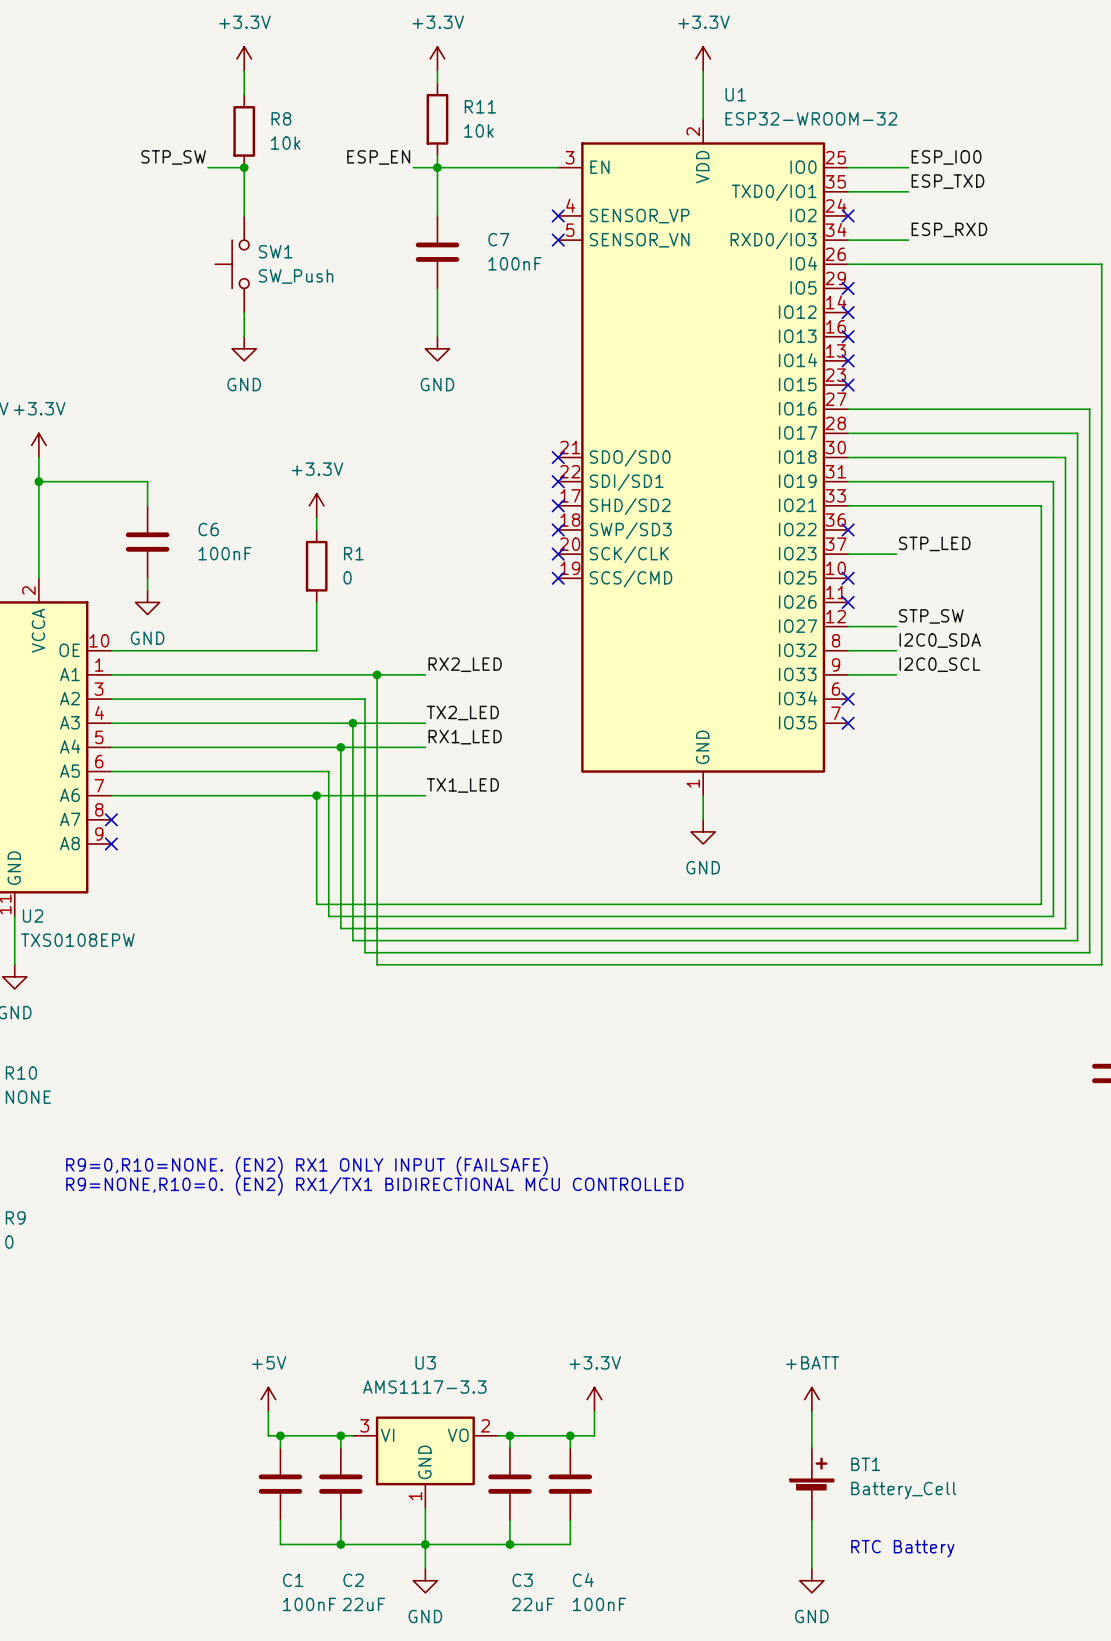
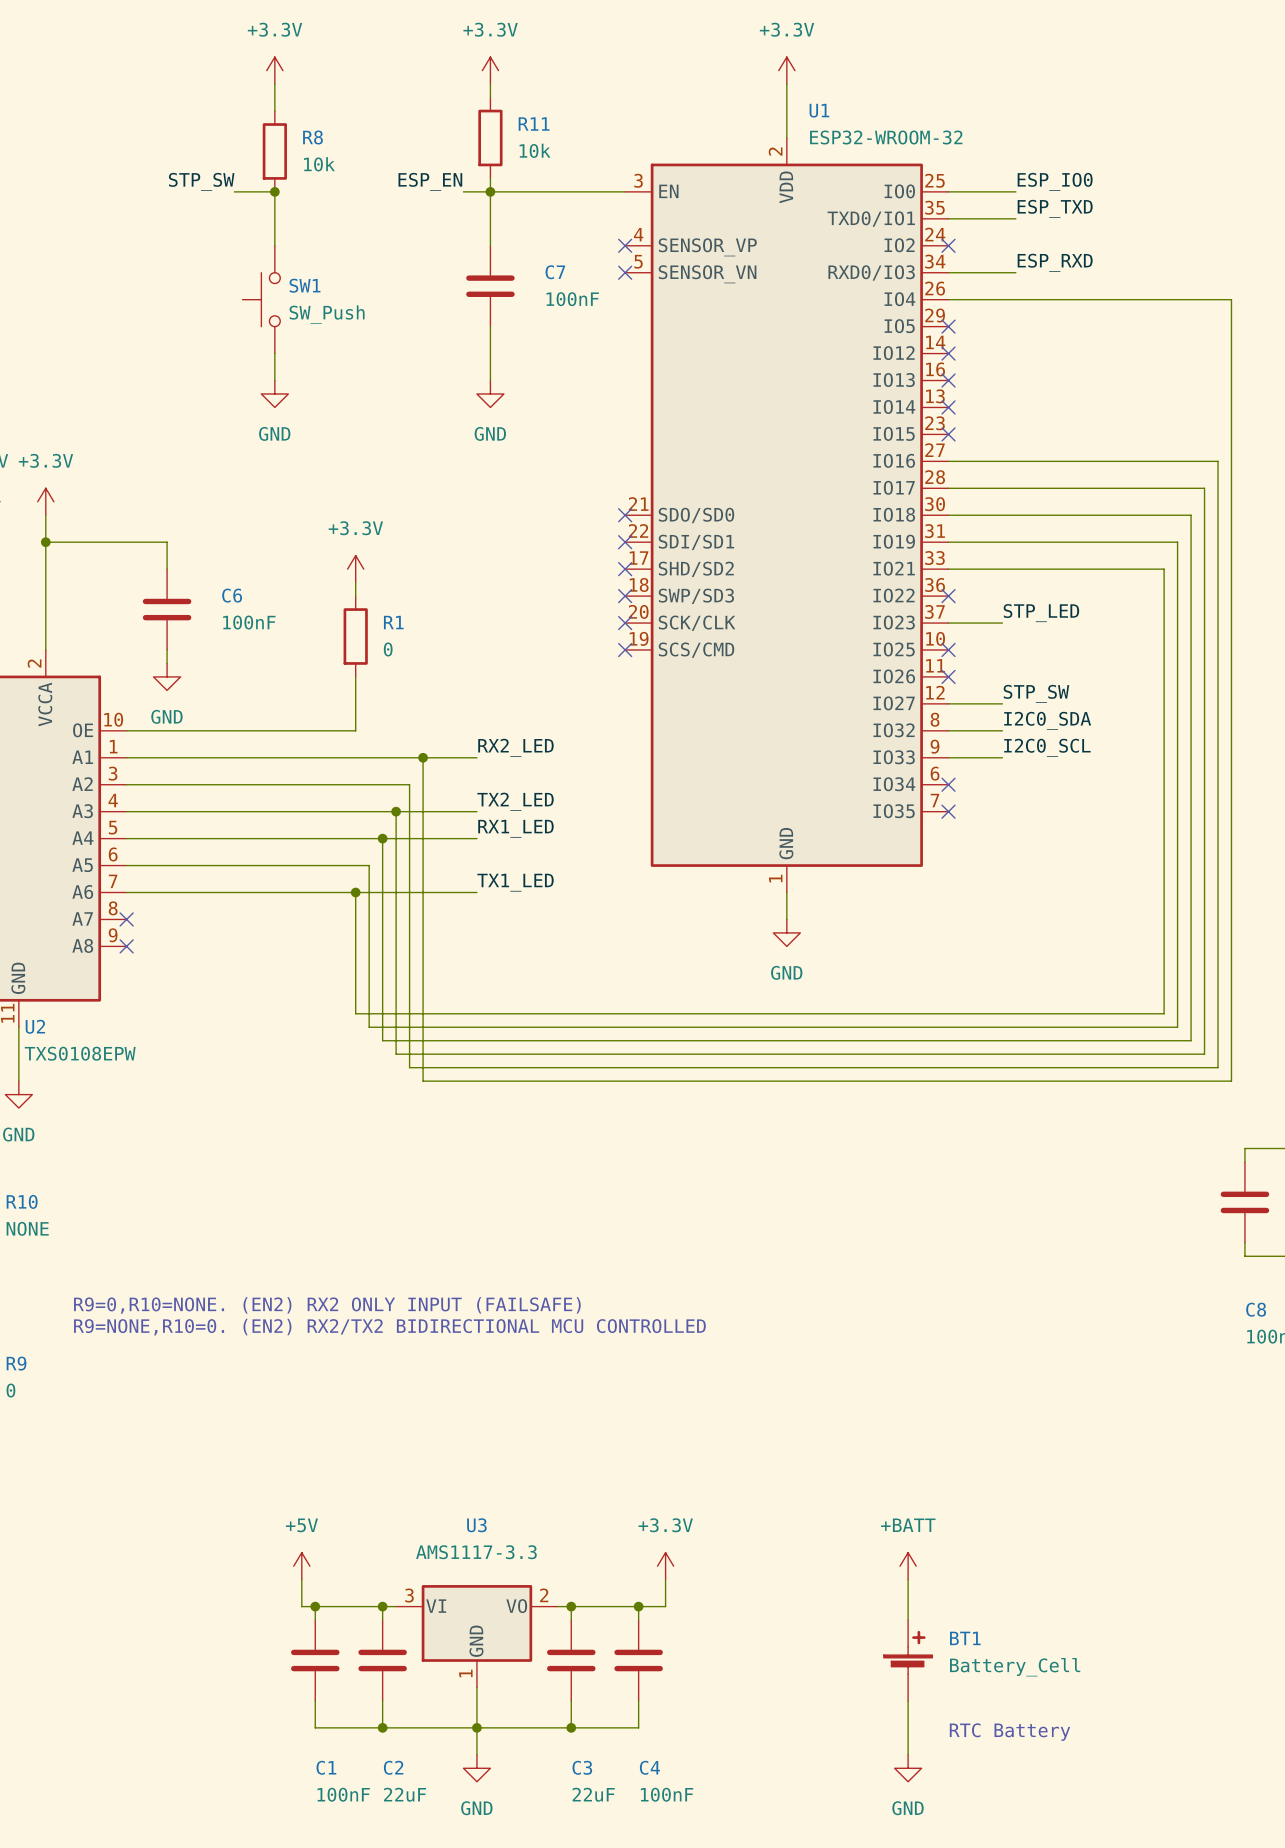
text: R9=0,R10=NONE. (EN2) RX1 ONLY INPUT (FAILSAFE) (306, 1166) -> R9=0,R10=NONE. (EN2) RX2 ONLY INPUT (FAILSAFE) (327, 1305)
text: R9=NONE,R10=0. (EN2) RX1/TX1 BIDIRECTIONAL MCU CONTROLLED (374, 1185) -> R9=NONE,R10=0. (EN2) RX2/TX2 BIDIRECTIONAL MCU CONTROLLED (389, 1327)

